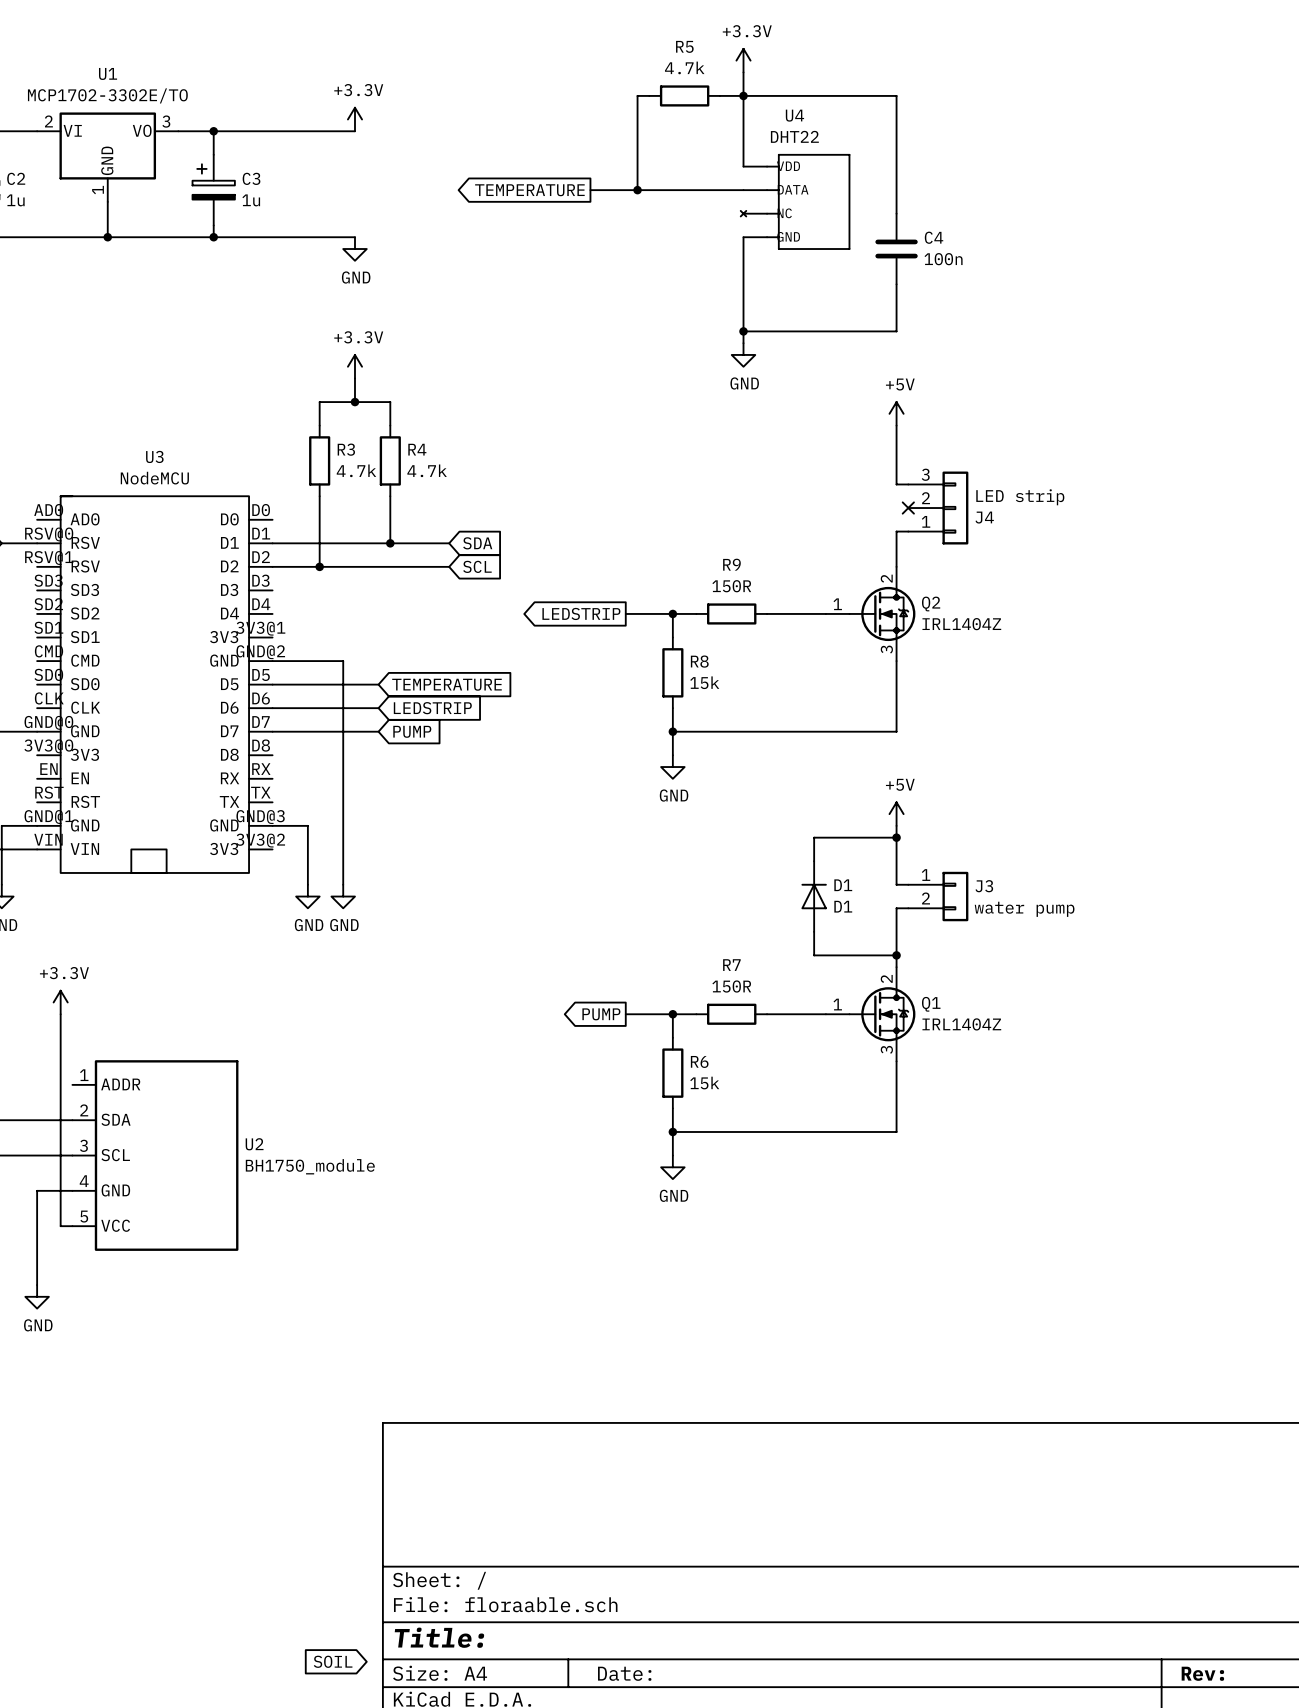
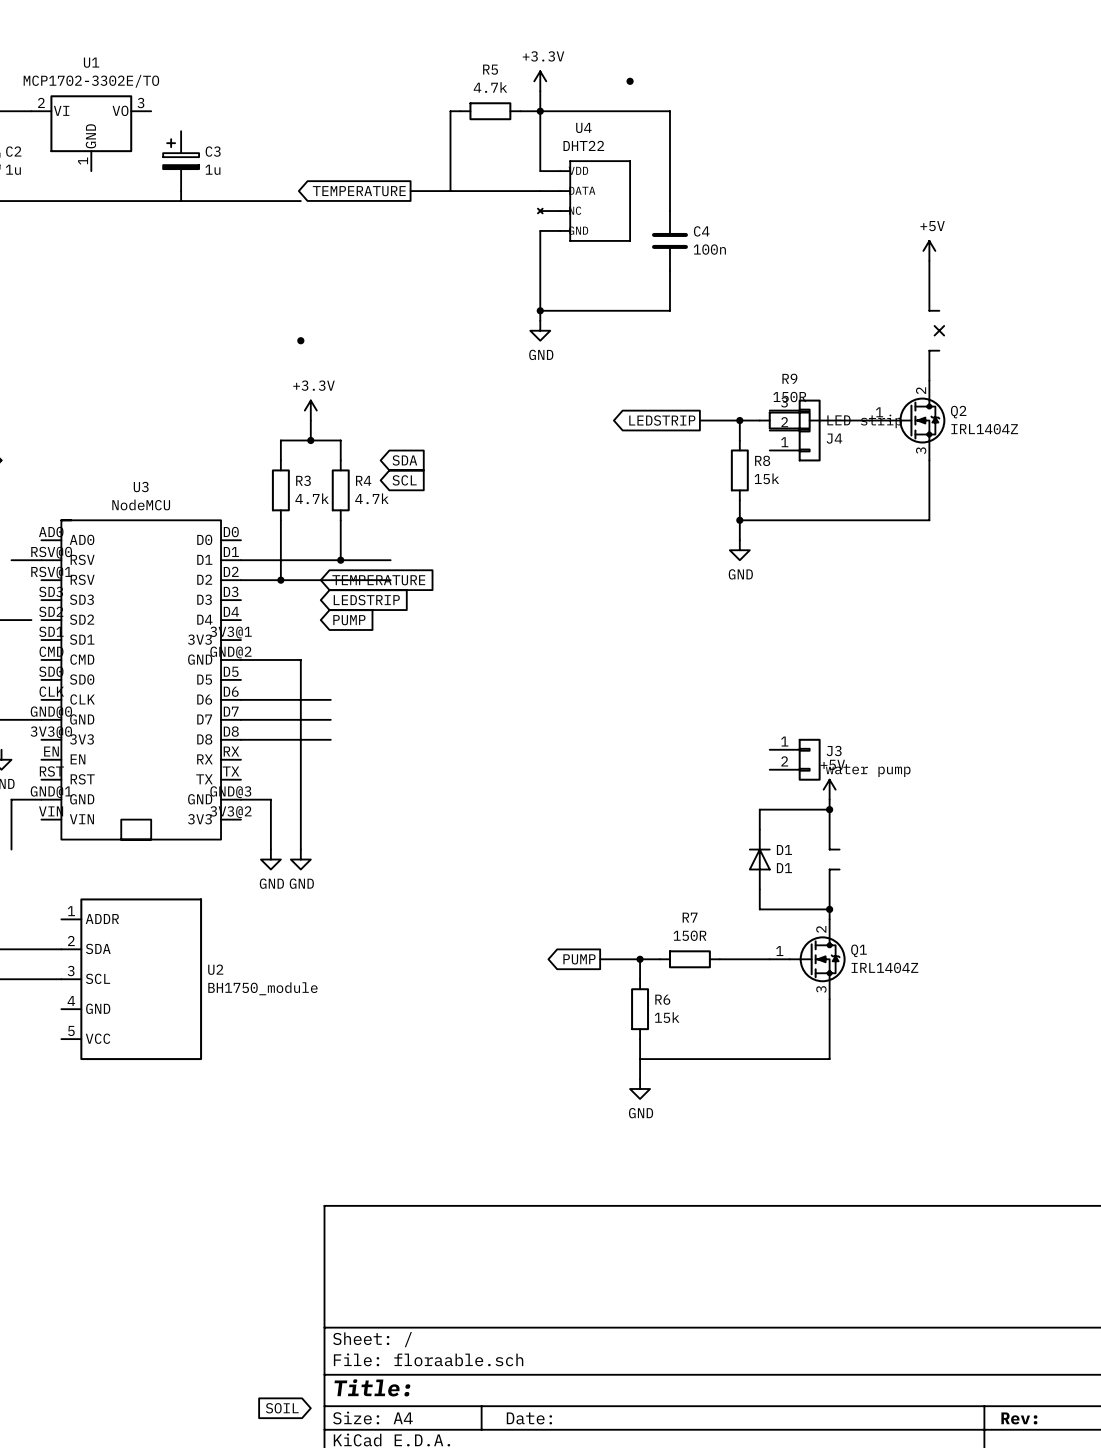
power symbol position: +3.3V (743, 60) -> +3.3V (540, 81)
wire: (743, 72) (743, 166) -> none
R5 position: (684, 95) -> (490, 111)
wire: (719, 95) (896, 95) (896, 213) -> (520, 111) (669, 111) (669, 211)
power symbol: +3.3V (354, 119) -> none
wire: (178, 131) (354, 131) -> none
wire: (213, 131) (213, 154) -> none
junction: (213, 131) -> none
wire: none -> (460, 111) (450, 111) (450, 191)
junction: none -> (540, 111)
global label position: TEMPERATURE (529, 190) -> TEMPERATURE (359, 191)
wire: (590, 190) (743, 190) -> (410, 191) (540, 191)
wire: none -> (540, 161) (540, 171)
junction: (637, 190) -> none
wire: (107, 201) (107, 237) -> none
U4 position: (795, 201) -> (584, 201)
junction: (107, 237) -> none
junction: (213, 237) -> none
wire: (743, 237) (743, 343) -> (540, 230) (540, 320)
power symbol: GND (354, 249) -> none
C4 position: (896, 249) -> (669, 240)
wire: (896, 284) (896, 331) (743, 331) -> (669, 270) (669, 310) (540, 310)
power symbol: none -> +5V (929, 250)
wire: none -> (929, 260) (929, 310) (939, 310)
junction: (743, 331) -> none
power symbol position: GND (743, 354) -> GND (540, 330)
power symbol position: +3.3V (354, 366) -> +3.3V (310, 410)
junction: none -> (540, 310)
wire: (354, 378) (354, 402) -> (310, 420) (310, 440)
no-connect mark: none -> (939, 330)
power symbol: +5V (896, 413) -> none
wire: none -> (939, 350) (929, 350) (929, 380)
wire: (319, 425) (319, 402) (390, 402) (390, 425) -> (280, 460) (280, 440) (340, 440) (340, 460)
wire: (896, 425) (896, 484) (908, 484) -> none
R3 position: (319, 460) -> (280, 490)
R4 position: (390, 460) -> (340, 490)
wire: (319, 496) (319, 566) -> (280, 520) (280, 580)
wire: (390, 496) (390, 543) -> (340, 520) (340, 560)
global label: none -> LEDSTRIP (662, 420)
wire: none -> (699, 420) (759, 420)
wire: none -> (739, 420) (739, 440)
junction: none -> (739, 420)
wire: none -> (819, 420) (869, 420)
no-connect mark: (908, 508) -> none
junction: none -> (310, 440)
wire: (908, 531) (896, 531) (896, 566) -> none
wire: (1, 543) (37, 543) -> (11, 560) (41, 560)
wire: (272, 543) (449, 543) -> none
junction: (390, 543) -> none
wire: none -> (929, 460) (929, 520) (739, 520)
wire: (272, 566) (449, 566) -> none
junction: (319, 566) -> none
wire: none -> (739, 500) (739, 540)
global label: LEDSTRIP (581, 613) -> none
wire: (625, 613) (696, 613) -> none
wire: (672, 613) (672, 637) -> none
junction: (672, 613) -> none
R9 position: (731, 613) -> (789, 420)
wire: (767, 613) (825, 613) -> none
Q2 position: (870, 613) -> (907, 420)
junction: none -> (739, 520)
power symbol: none -> GND (739, 550)
wire: (343, 661) (343, 884) -> (290, 560) (390, 560)
junction: none -> (340, 560)
wire: (896, 661) (896, 731) (672, 731) -> none
R8 position: (672, 672) -> (739, 470)
U3 position: (154, 684) -> (141, 679)
junction: none -> (280, 580)
wire: none -> (320, 580) (390, 580)
wire: (272, 708) (378, 708) -> (240, 739) (330, 739)
wire: (672, 708) (672, 755) -> none
wire: (272, 731) (378, 731) -> (240, 719) (330, 719)
junction: (672, 731) -> none
power symbol: GND (672, 767) -> none
wire: none -> (240, 659) (300, 659) (300, 849)
power symbol position: +5V (896, 814) -> +5V (829, 789)
wire: (37, 825) (1, 825) (1, 884) -> (41, 799) (11, 799) (11, 849)
wire: (307, 825) (307, 884) -> (260, 699) (330, 699)
wire: (896, 825) (896, 884) (908, 884) -> (829, 799) (829, 849) (839, 849)
wire: (896, 837) (814, 837) (814, 861) -> none
junction: (896, 837) -> none
power symbol: GND (307, 896) -> none
power symbol: GND (343, 896) -> none
D1 position: (814, 896) -> (759, 859)
wire: (908, 908) (896, 908) (896, 955) (814, 955) (814, 931) -> none
wire: none -> (240, 799) (270, 799) (270, 849)
wire: none -> (759, 809) (829, 809)
junction: (896, 955) -> none
junction: none -> (829, 809)
power symbol: +3.3V (60, 1002) -> none
wire: (60, 1014) (60, 1226) (72, 1226) -> none
power symbol: none -> GND (270, 859)
power symbol: none -> GND (300, 859)
global label position: PUMP (601, 1014) -> PUMP (579, 959)
wire: (625, 1014) (696, 1014) -> none
wire: (672, 1014) (672, 1037) -> (640, 959) (640, 979)
junction: (672, 1014) -> none
R7 position: (731, 1014) -> (689, 959)
wire: (767, 1014) (825, 1014) -> none
Q1 position: (870, 1014) -> (807, 959)
wire: none -> (839, 869) (829, 869) (829, 919)
R6 position: (672, 1073) -> (640, 1009)
wire: (896, 1073) (896, 1131) -> (769, 959) (759, 959)
wire: none -> (759, 909) (829, 909)
junction: none -> (829, 909)
wire: (672, 1108) (672, 1155) -> (640, 1039) (640, 1079)
wire: (672, 1131) (708, 1131) -> none
junction: (672, 1131) -> none
junction: none -> (640, 959)
wire: (778, 1131) (849, 1131) -> none
power symbol position: GND (672, 1167) -> GND (640, 1089)
wire: none -> (829, 999) (829, 1059) (640, 1059)
wire: (72, 1190) (37, 1190) (37, 1285) -> none
power symbol: GND (37, 1296) -> none

